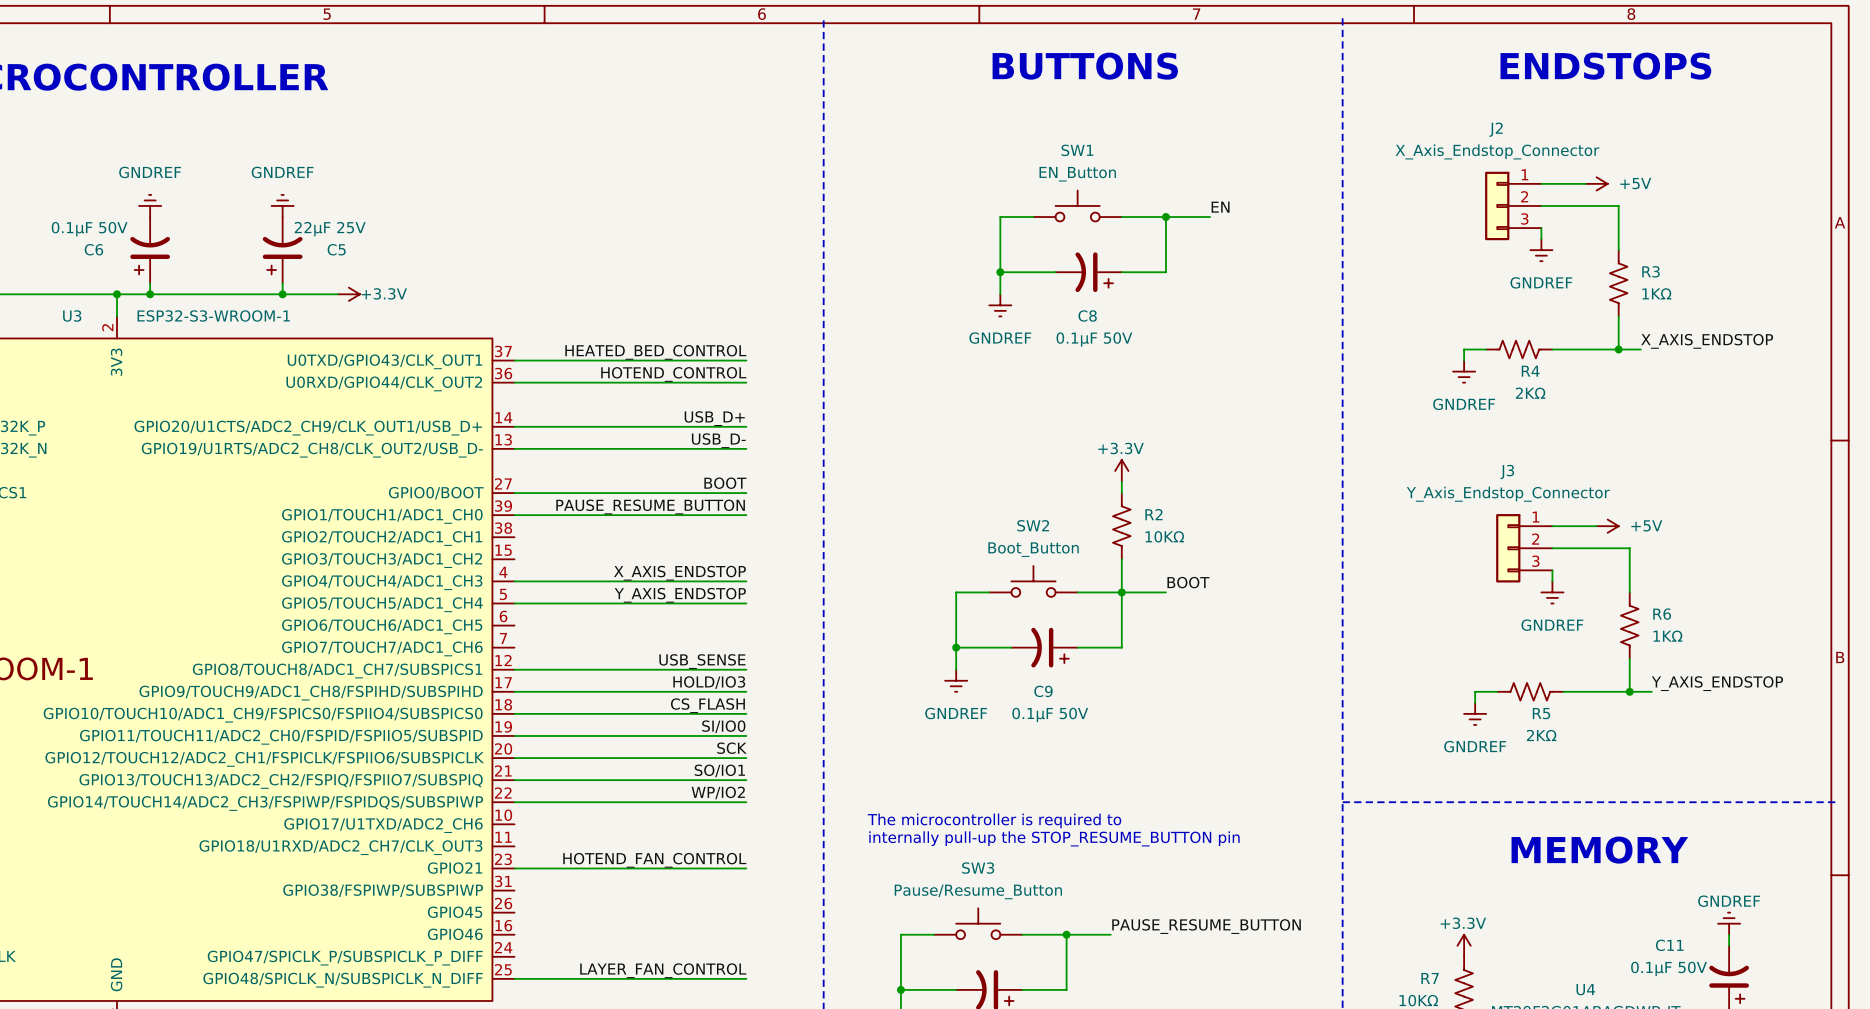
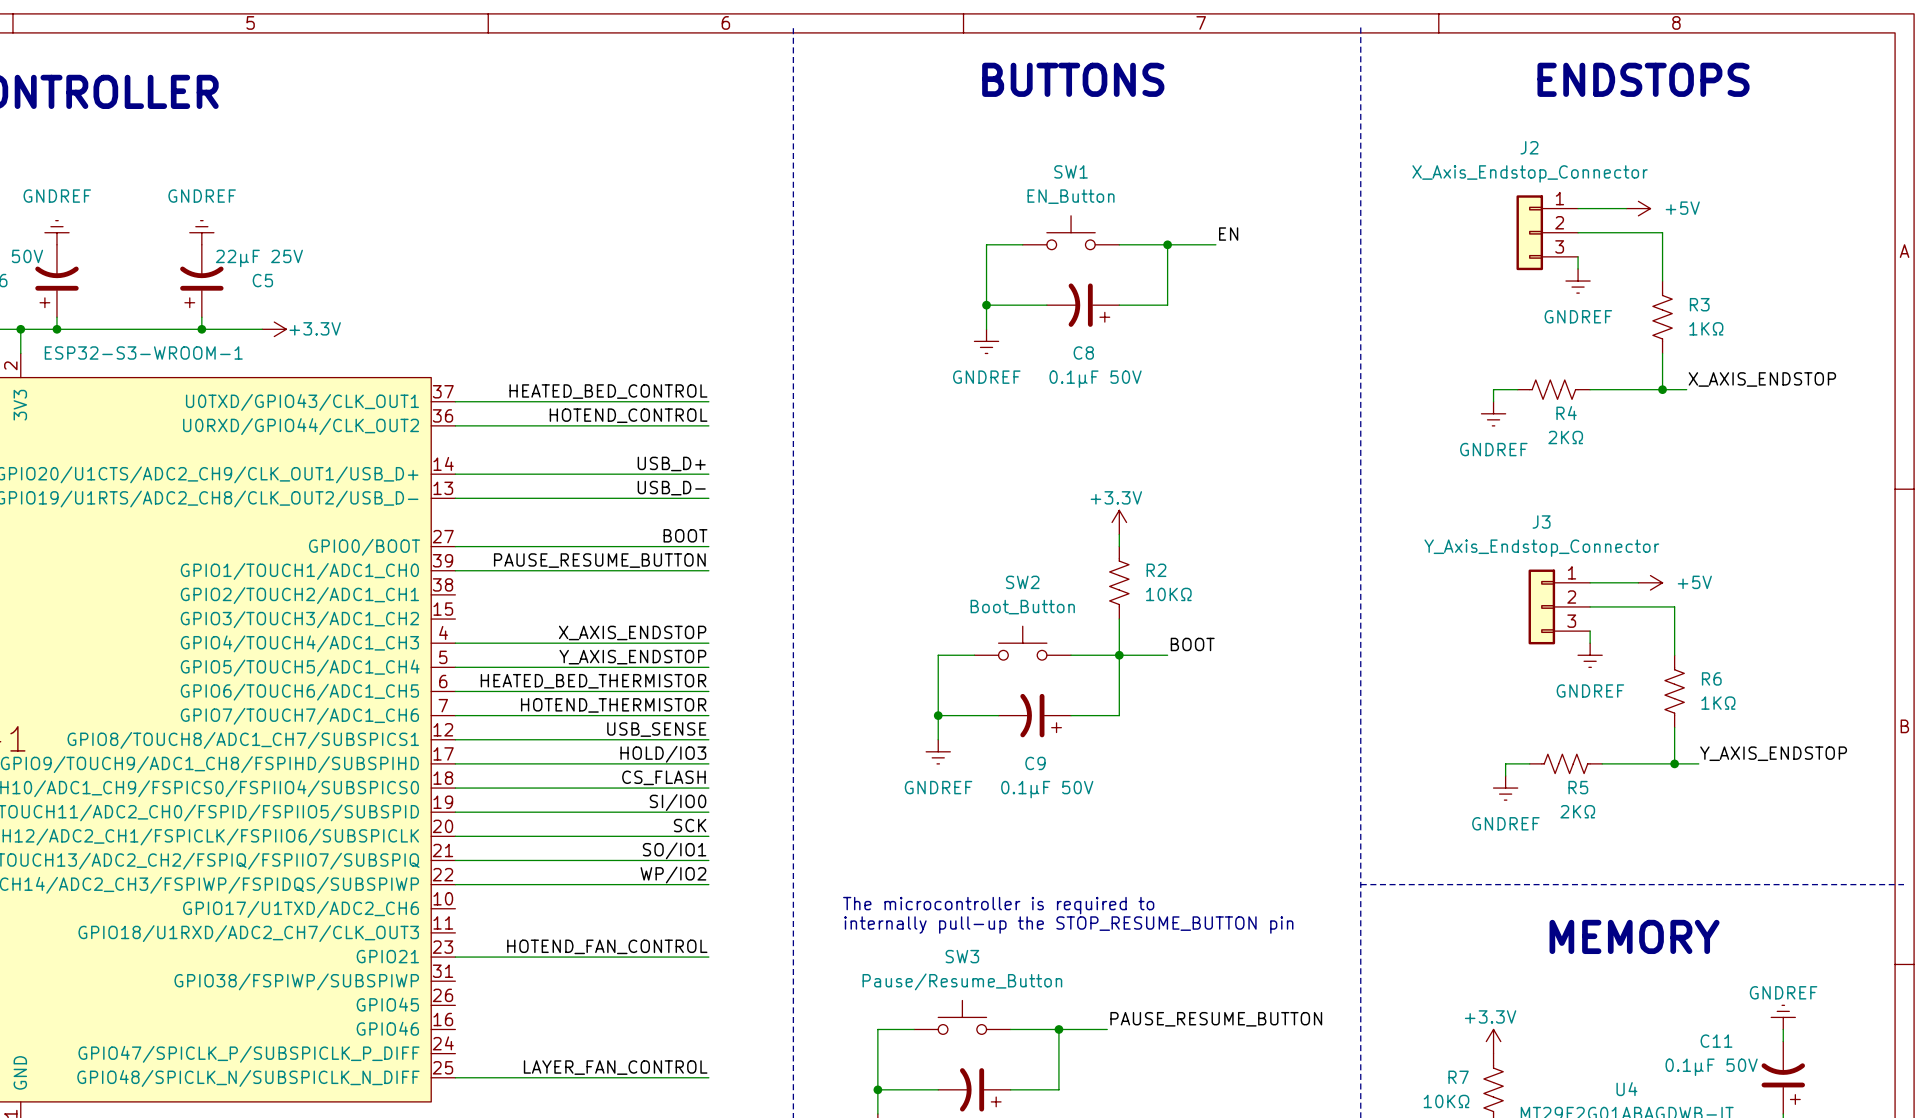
label: none -> HEATED_BED_THERMISTOR (593, 681)
wire: none -> (455, 691) (708, 691)
label: none -> HOTEND_THERMISTOR (613, 705)
wire: none -> (455, 715) (708, 715)

